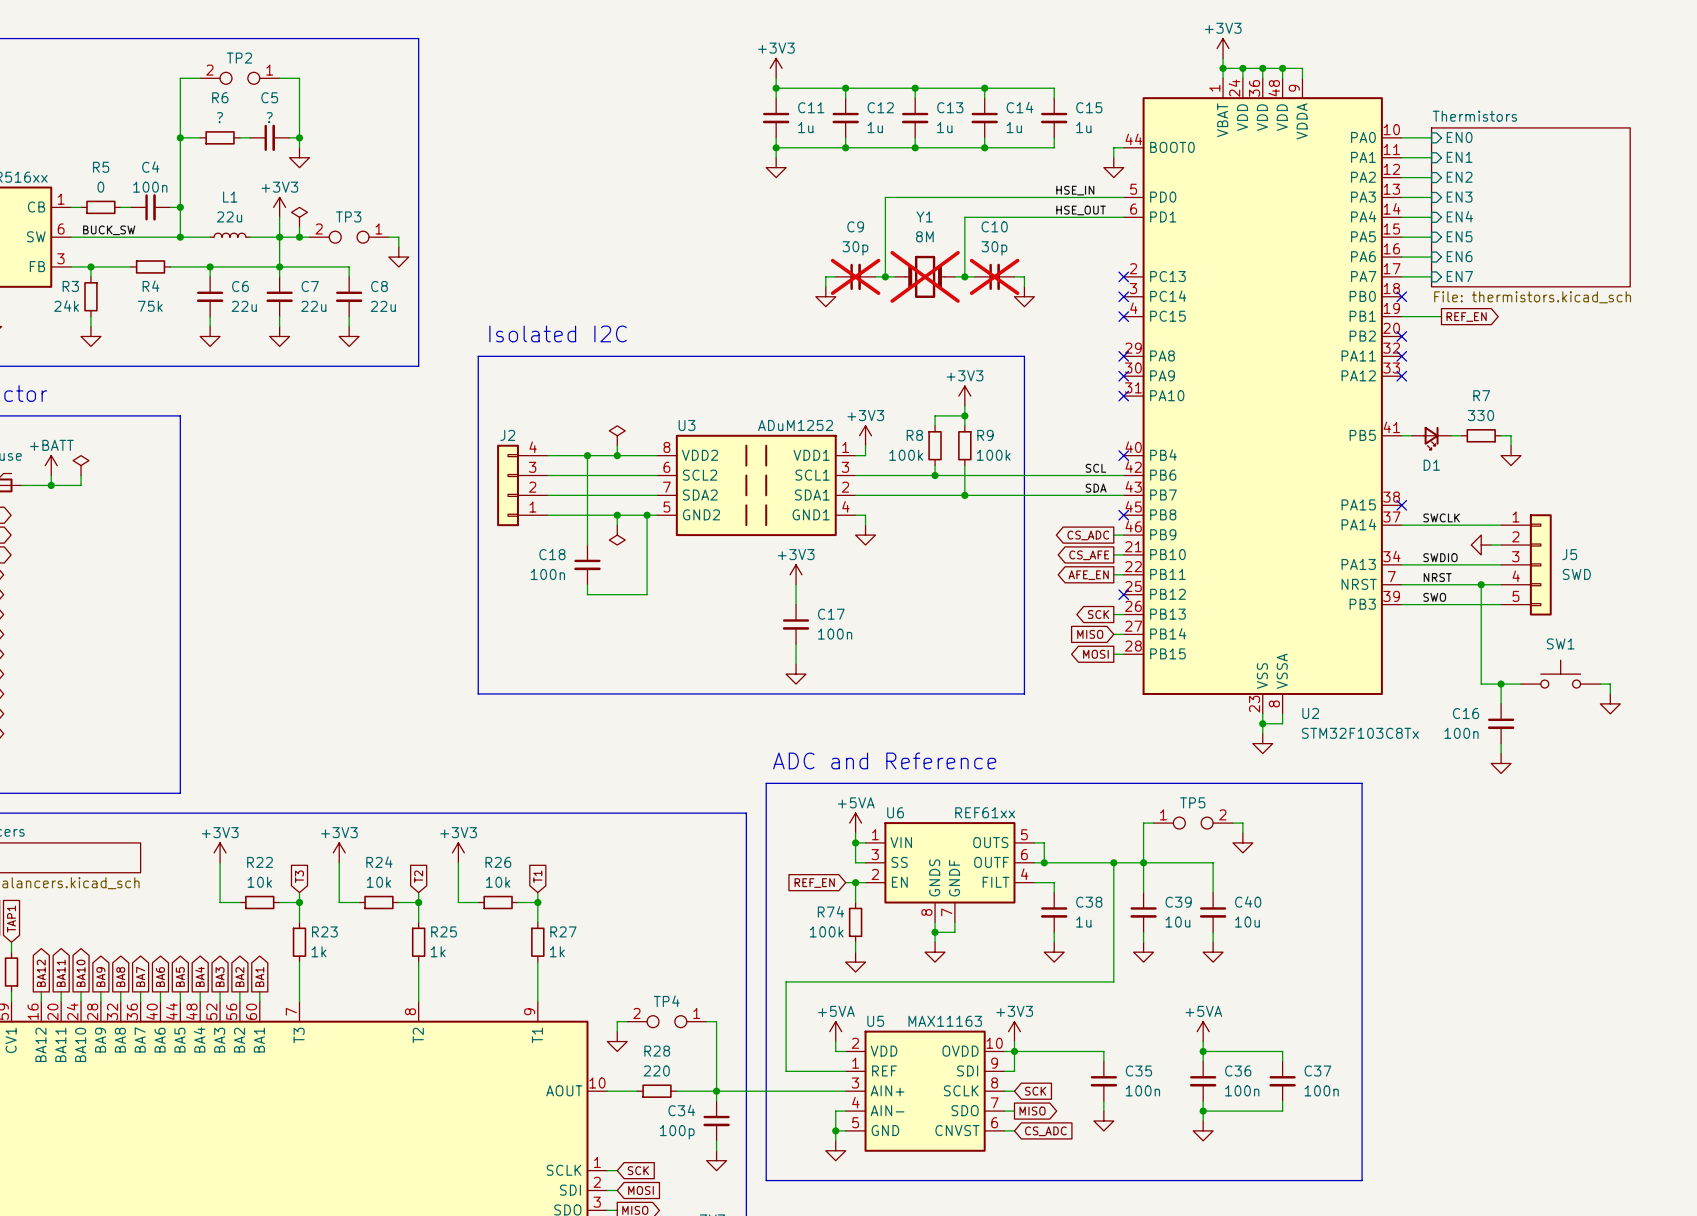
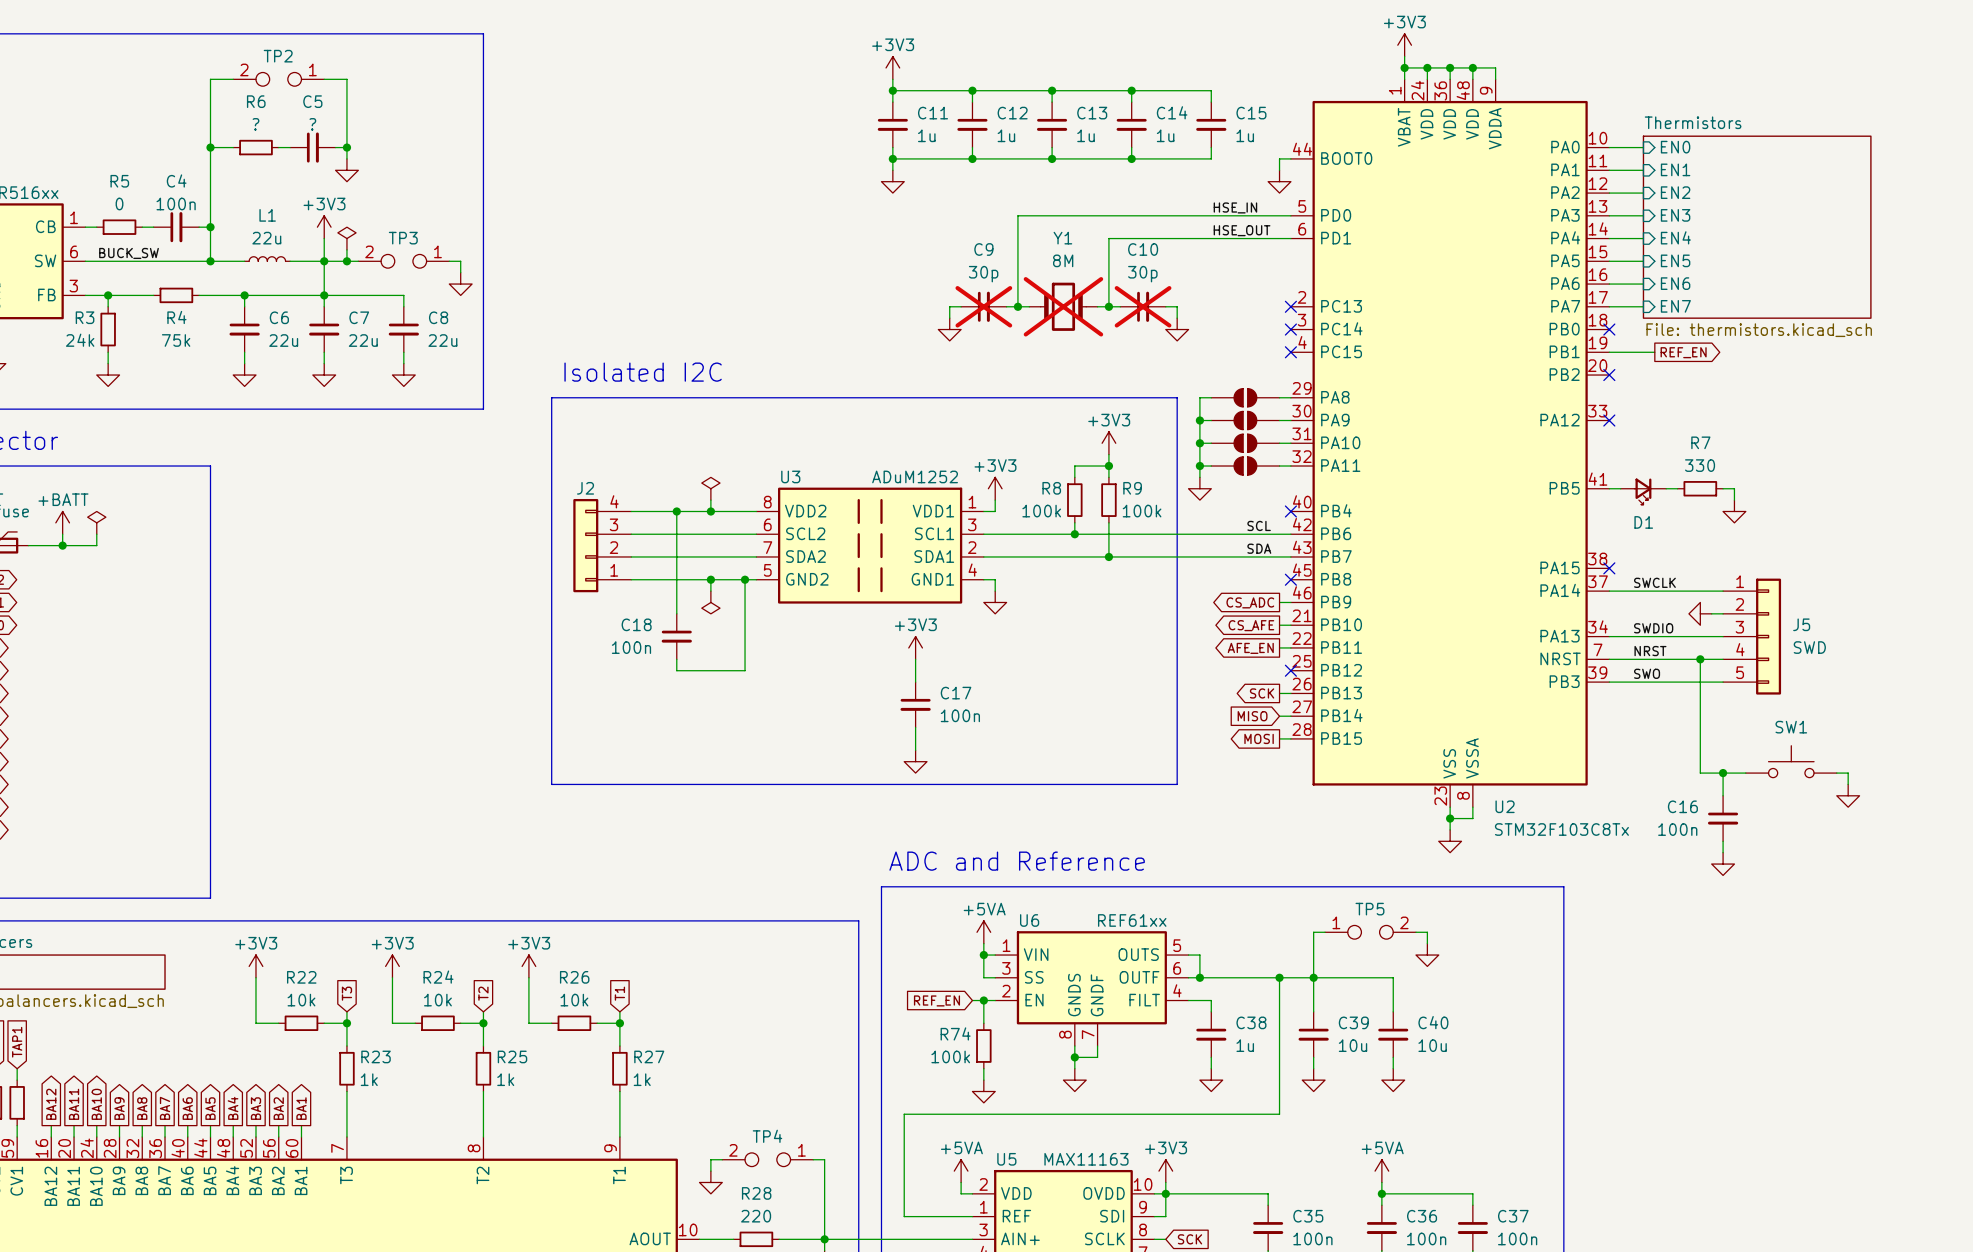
U2 symbol: [1123, 78, 1402, 714] -> [1290, 79, 1610, 808]
wire: none -> (1211, 397) (1199, 397) (1199, 477)
part: none -> (1245, 397)
wire: none -> (1279, 397) (1290, 397)
no-connect mark: (1123, 356) -> none
no-connect mark: (1401, 356) -> none
wire: none -> (1199, 420) (1211, 420)
junction: none -> (1199, 420)
part: none -> (1245, 420)
wire: none -> (1279, 420) (1290, 420)
no-connect mark: (1123, 376) -> none
wire: none -> (1199, 443) (1211, 443)
junction: none -> (1199, 443)
part: none -> (1245, 443)
wire: none -> (1279, 443) (1290, 443)
no-connect mark: (1123, 396) -> none
wire: none -> (1199, 466) (1211, 466)
junction: none -> (1199, 466)
part: none -> (1245, 466)
wire: none -> (1279, 466) (1290, 466)
power symbol: none -> (1199, 488)

